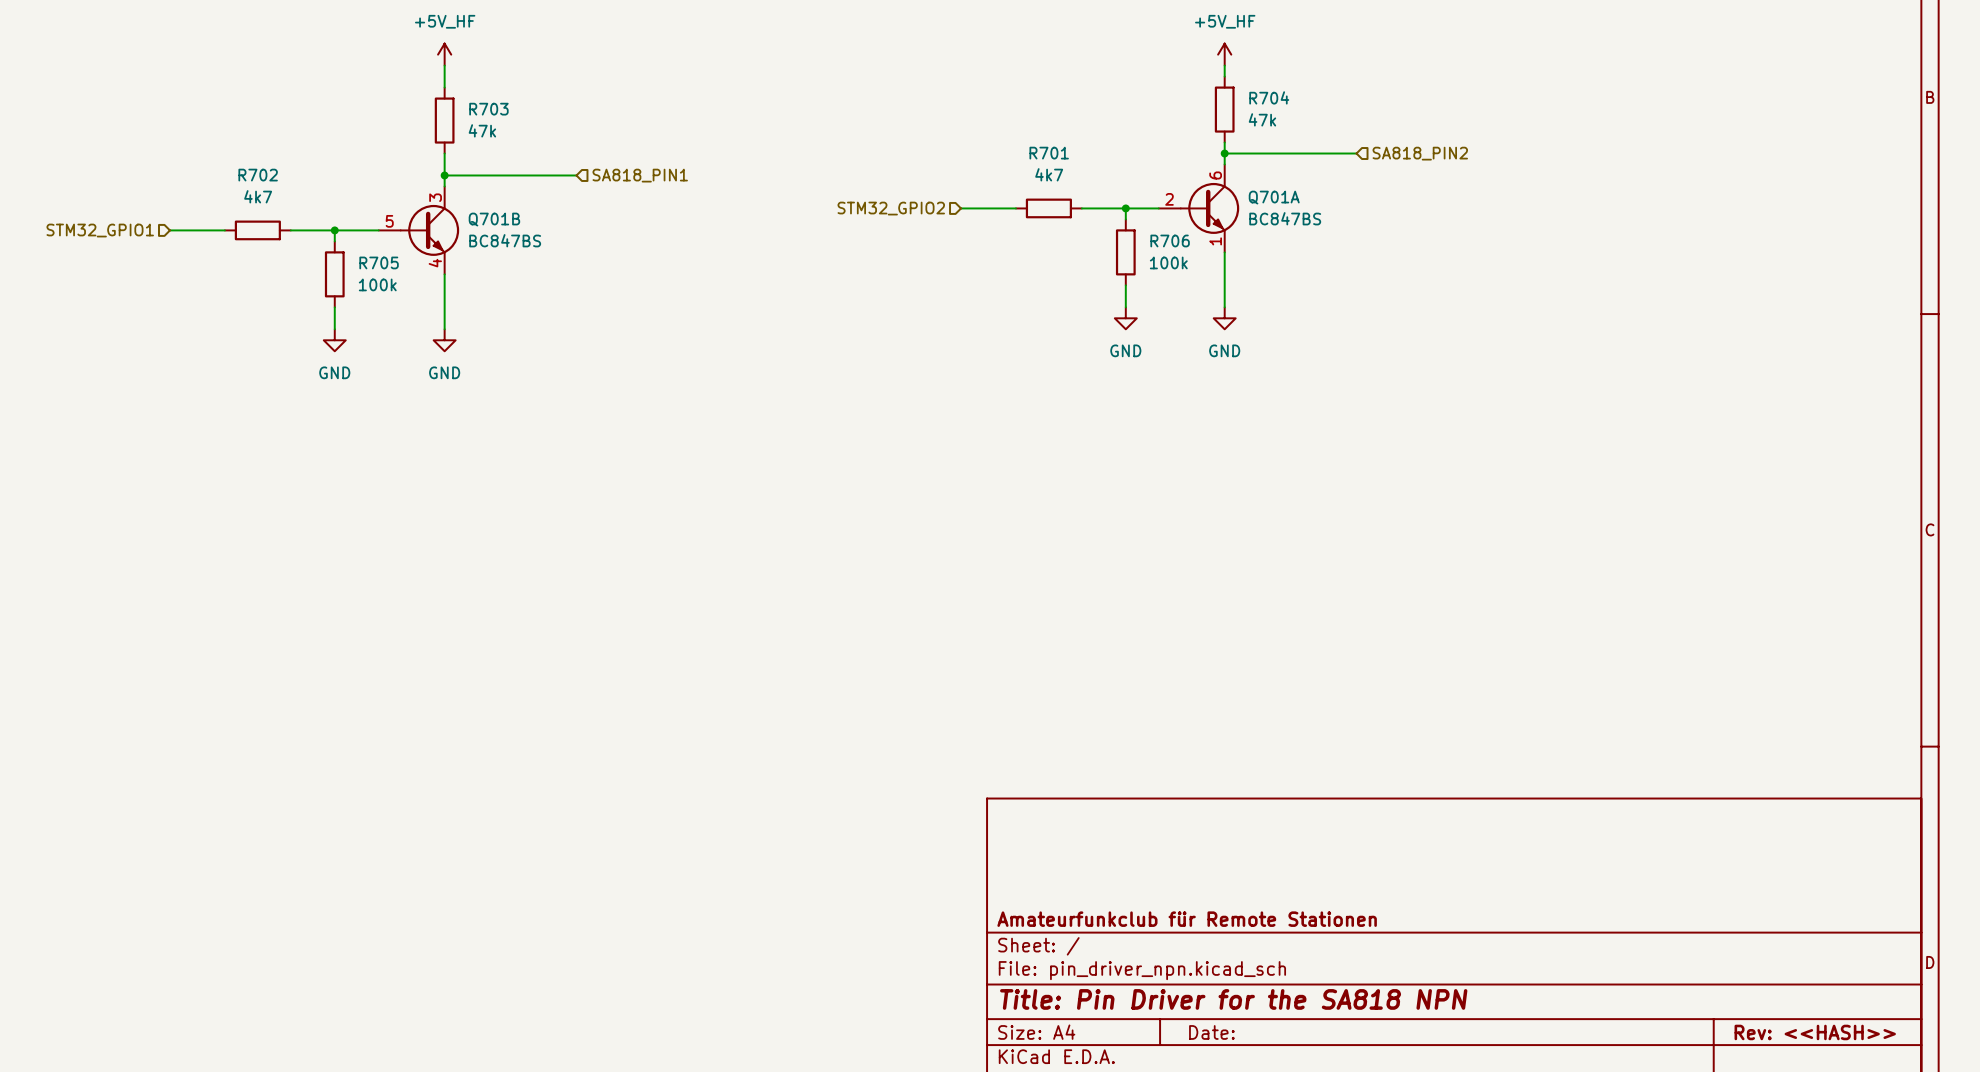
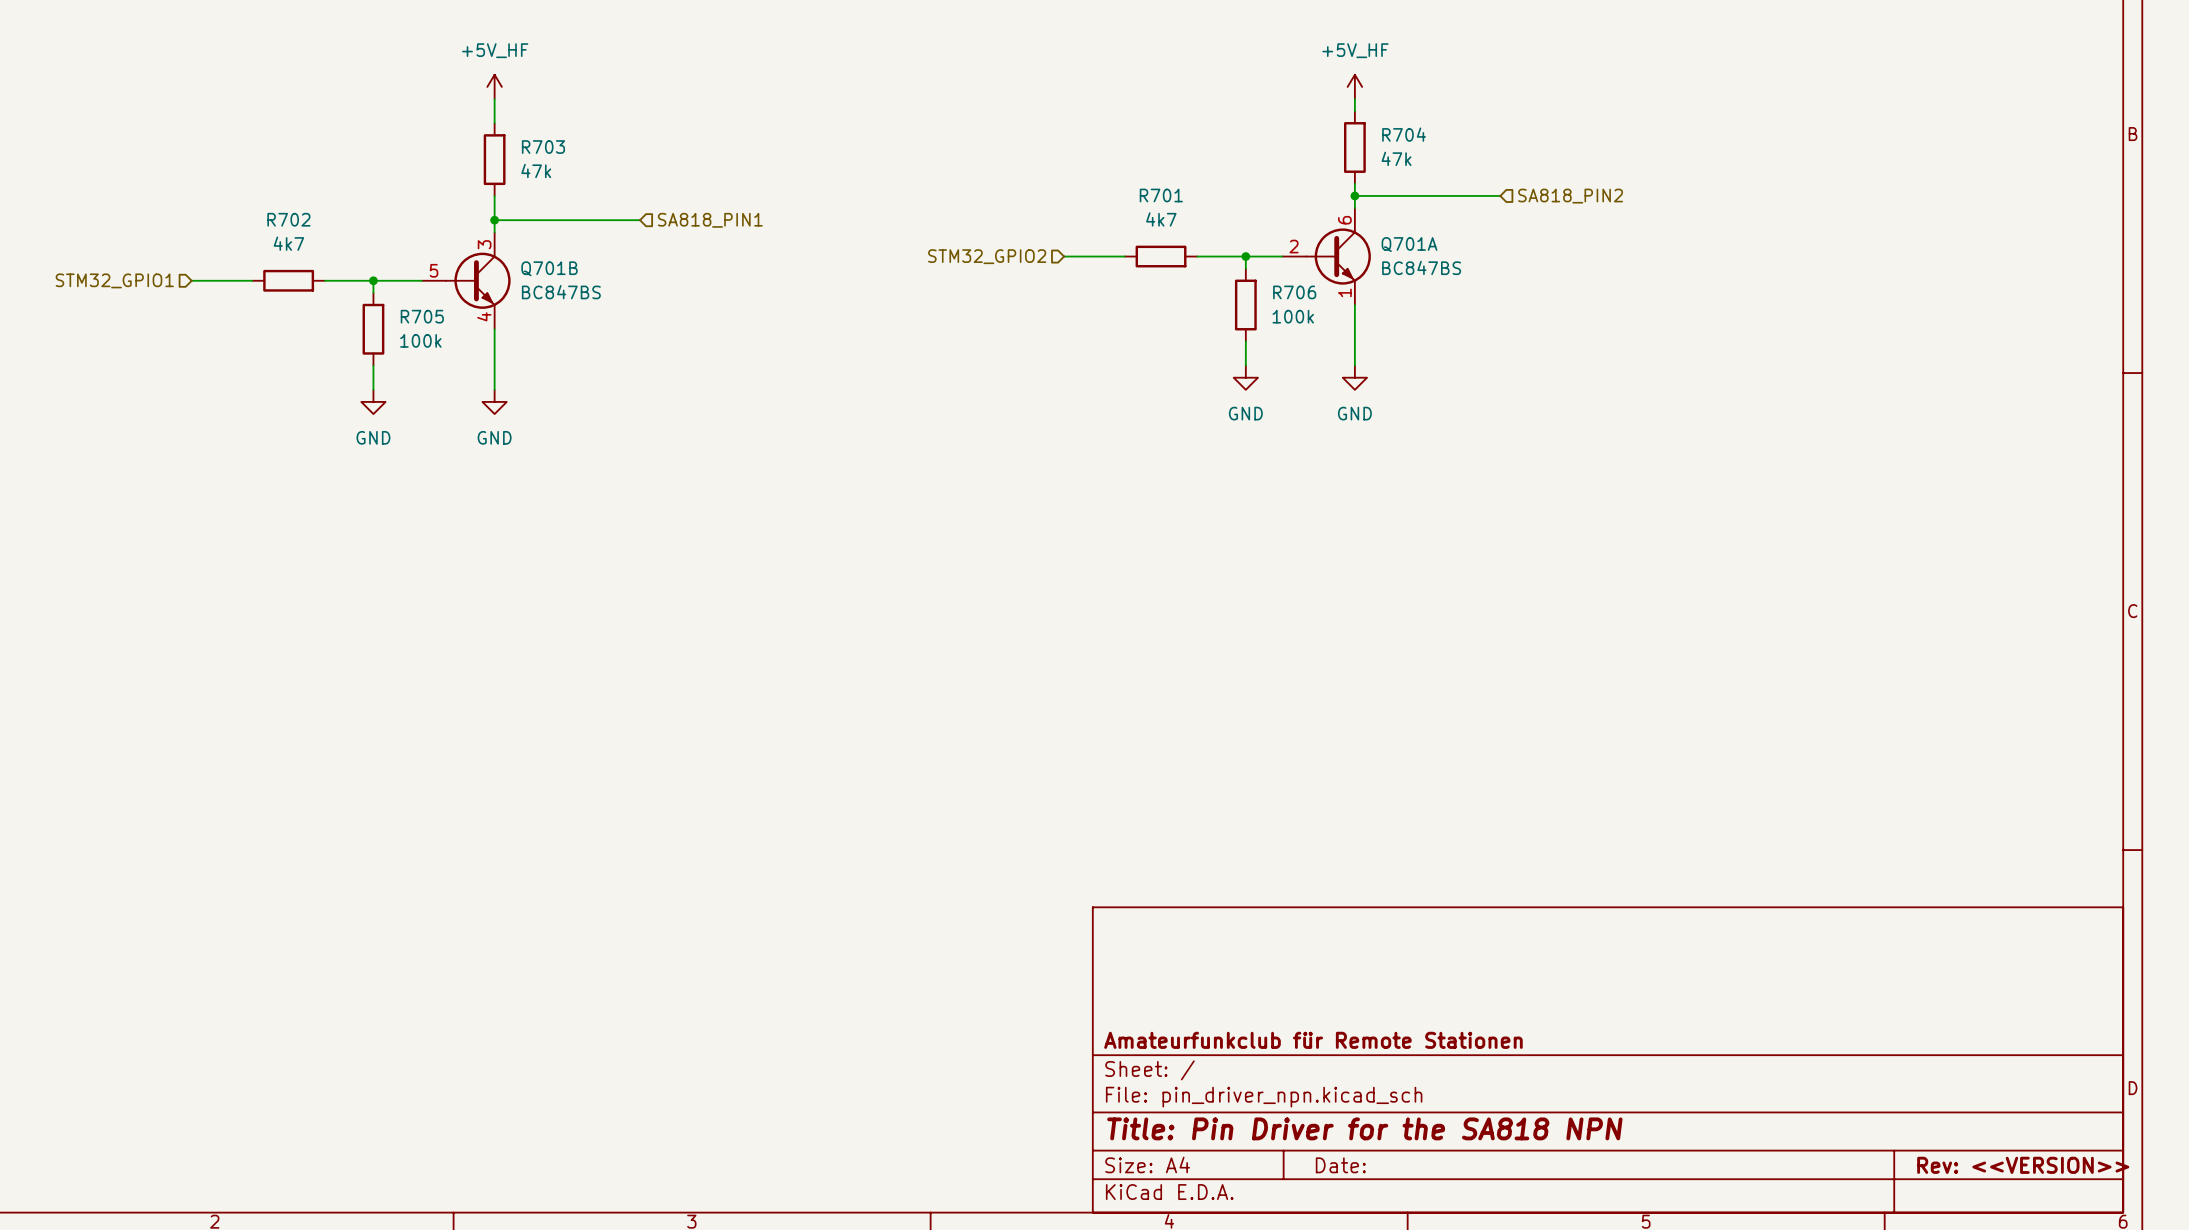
title block: Rev: <<HASH>> (1815, 1032) -> Rev: <<VERSION>> (2023, 1165)

